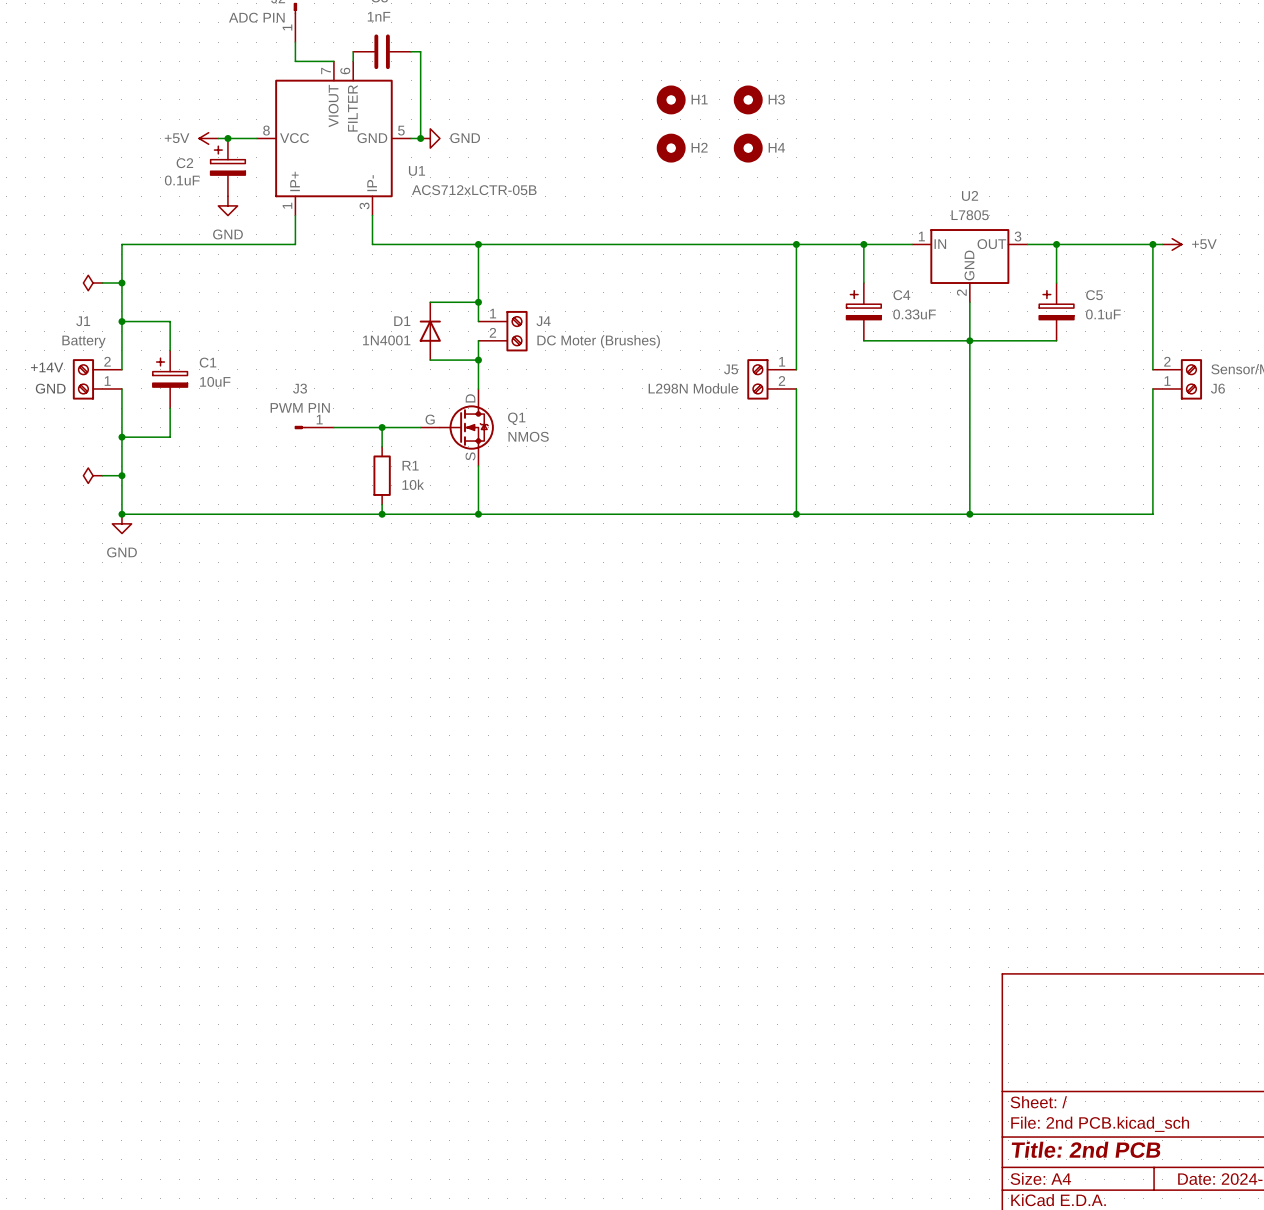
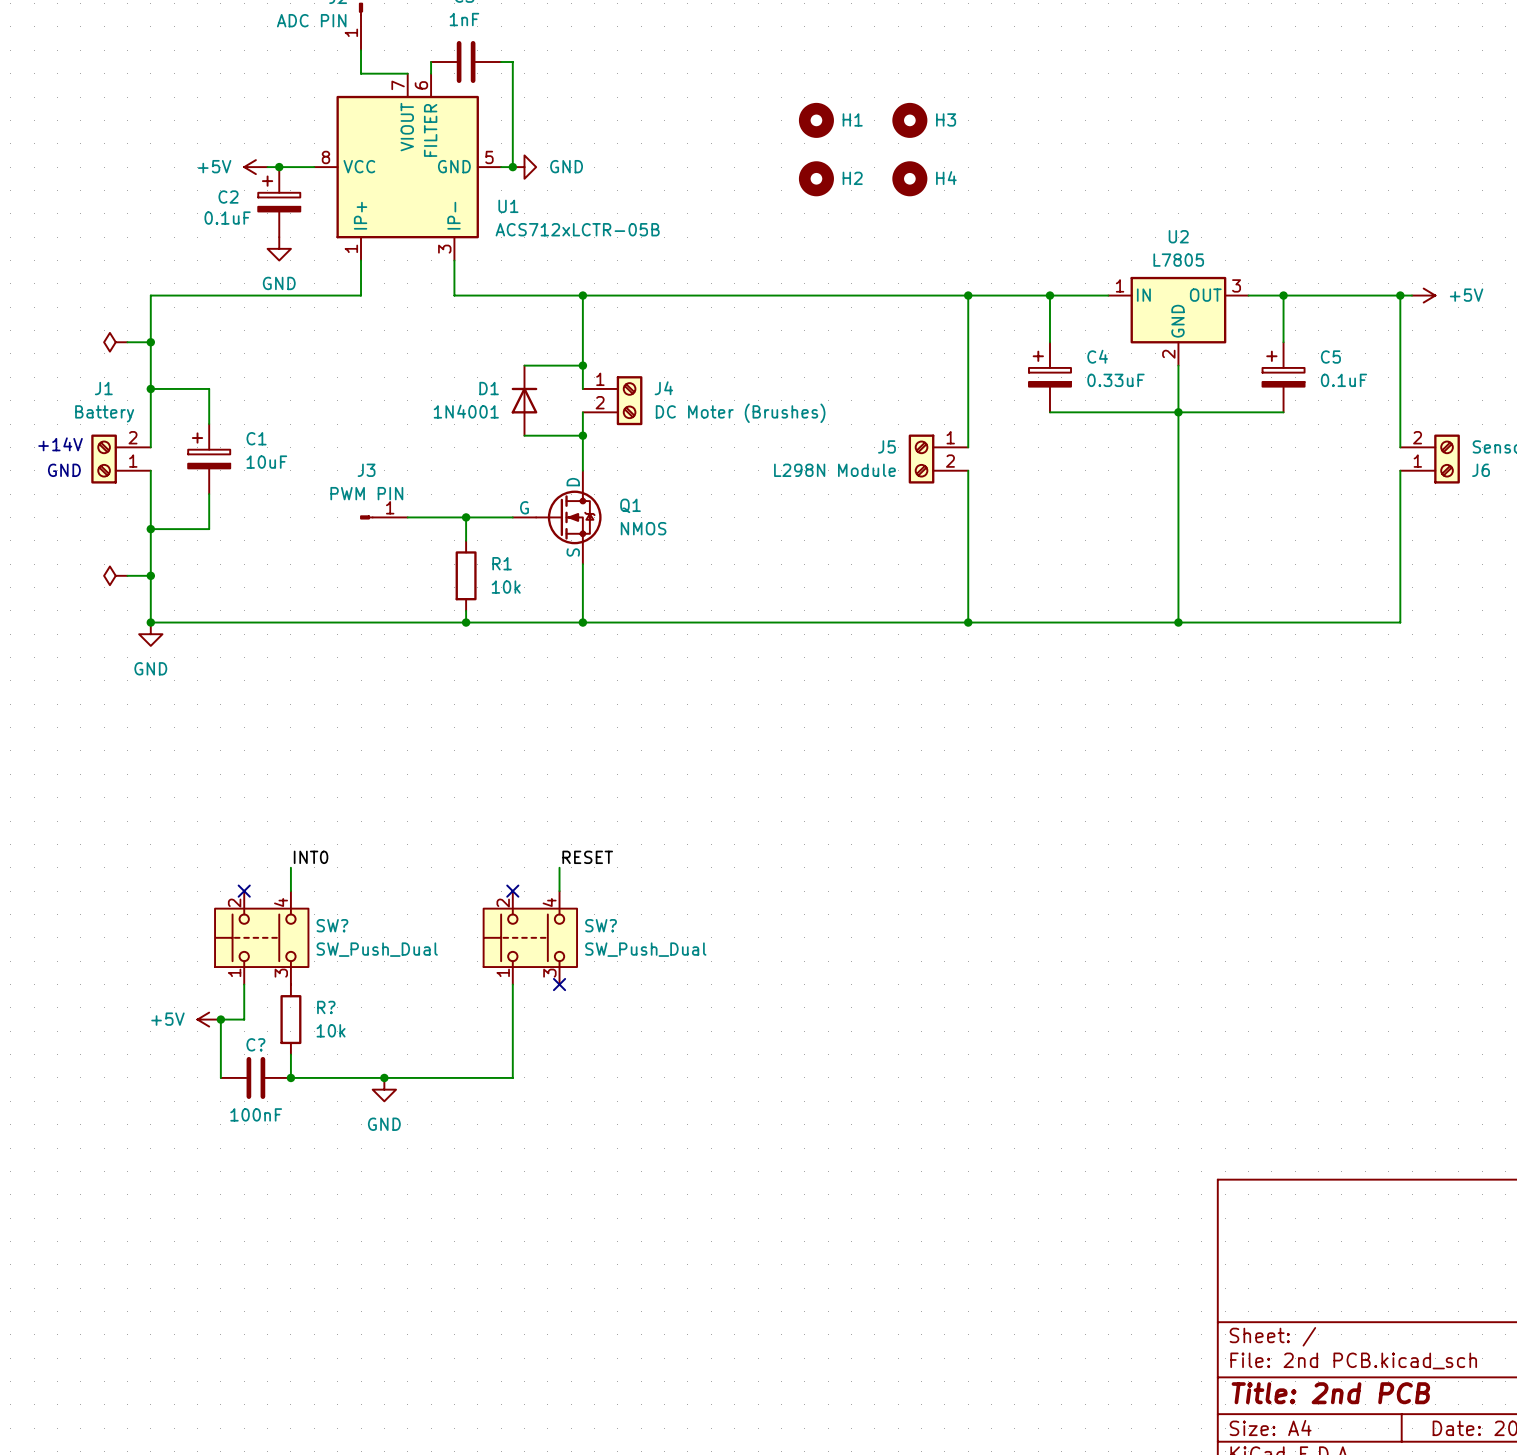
label: none -> INT0 (311, 857)
label: none -> RESET (587, 857)
wire: none -> (290, 867) (290, 891)
wire: none -> (559, 867) (559, 891)
no-connect mark: none -> (244, 891)
no-connect mark: none -> (512, 891)
SW?: none -> SW_Push_Dual (261, 937)
SW?: none -> SW_Push_Dual (530, 937)
wire: none -> (244, 984) (244, 1019) (220, 1019) (220, 1077)
wire: none -> (512, 984) (512, 1077) (290, 1077) (290, 1054)
no-connect mark: none -> (559, 984)
power symbol: none -> +5V (209, 1019)
junction: none -> (220, 1019)
R?: none -> 10k (290, 1019)
C?: none -> 100nF (255, 1077)
junction: none -> (290, 1077)
junction: none -> (384, 1077)
power symbol: none -> GND (384, 1089)

